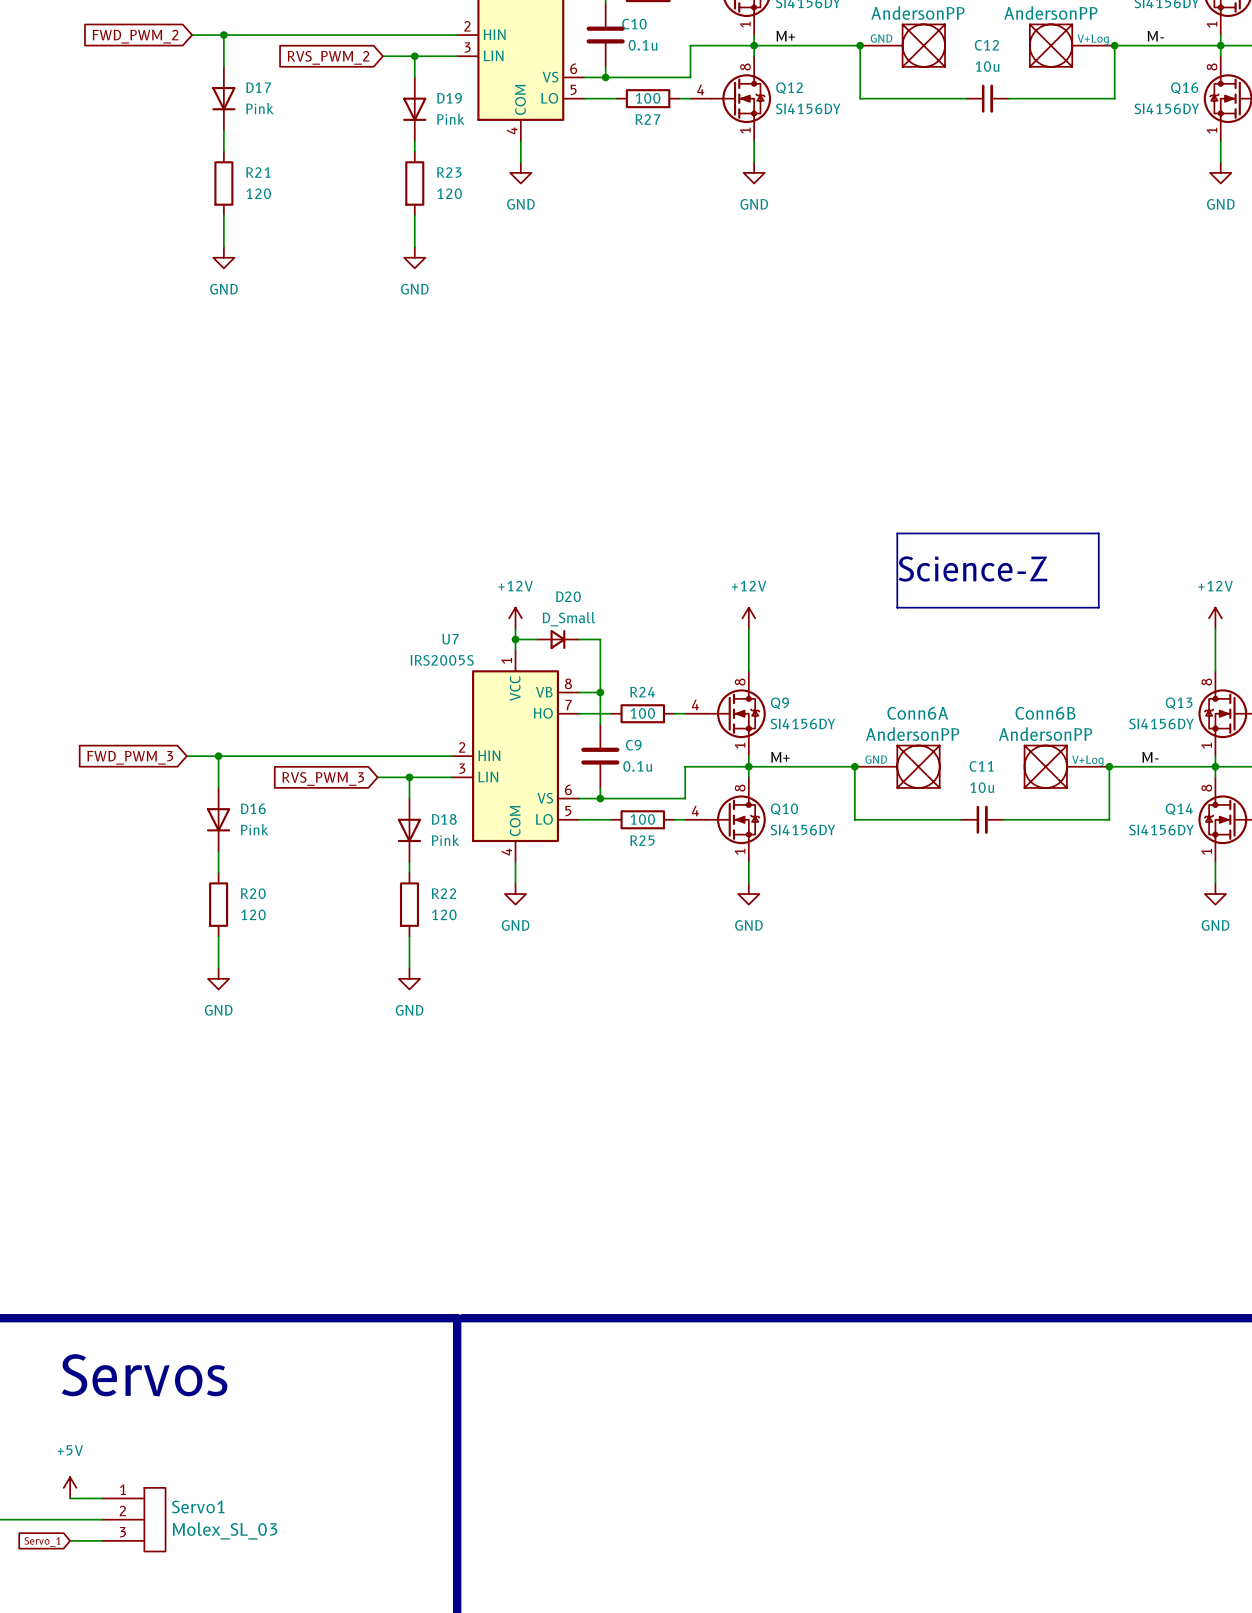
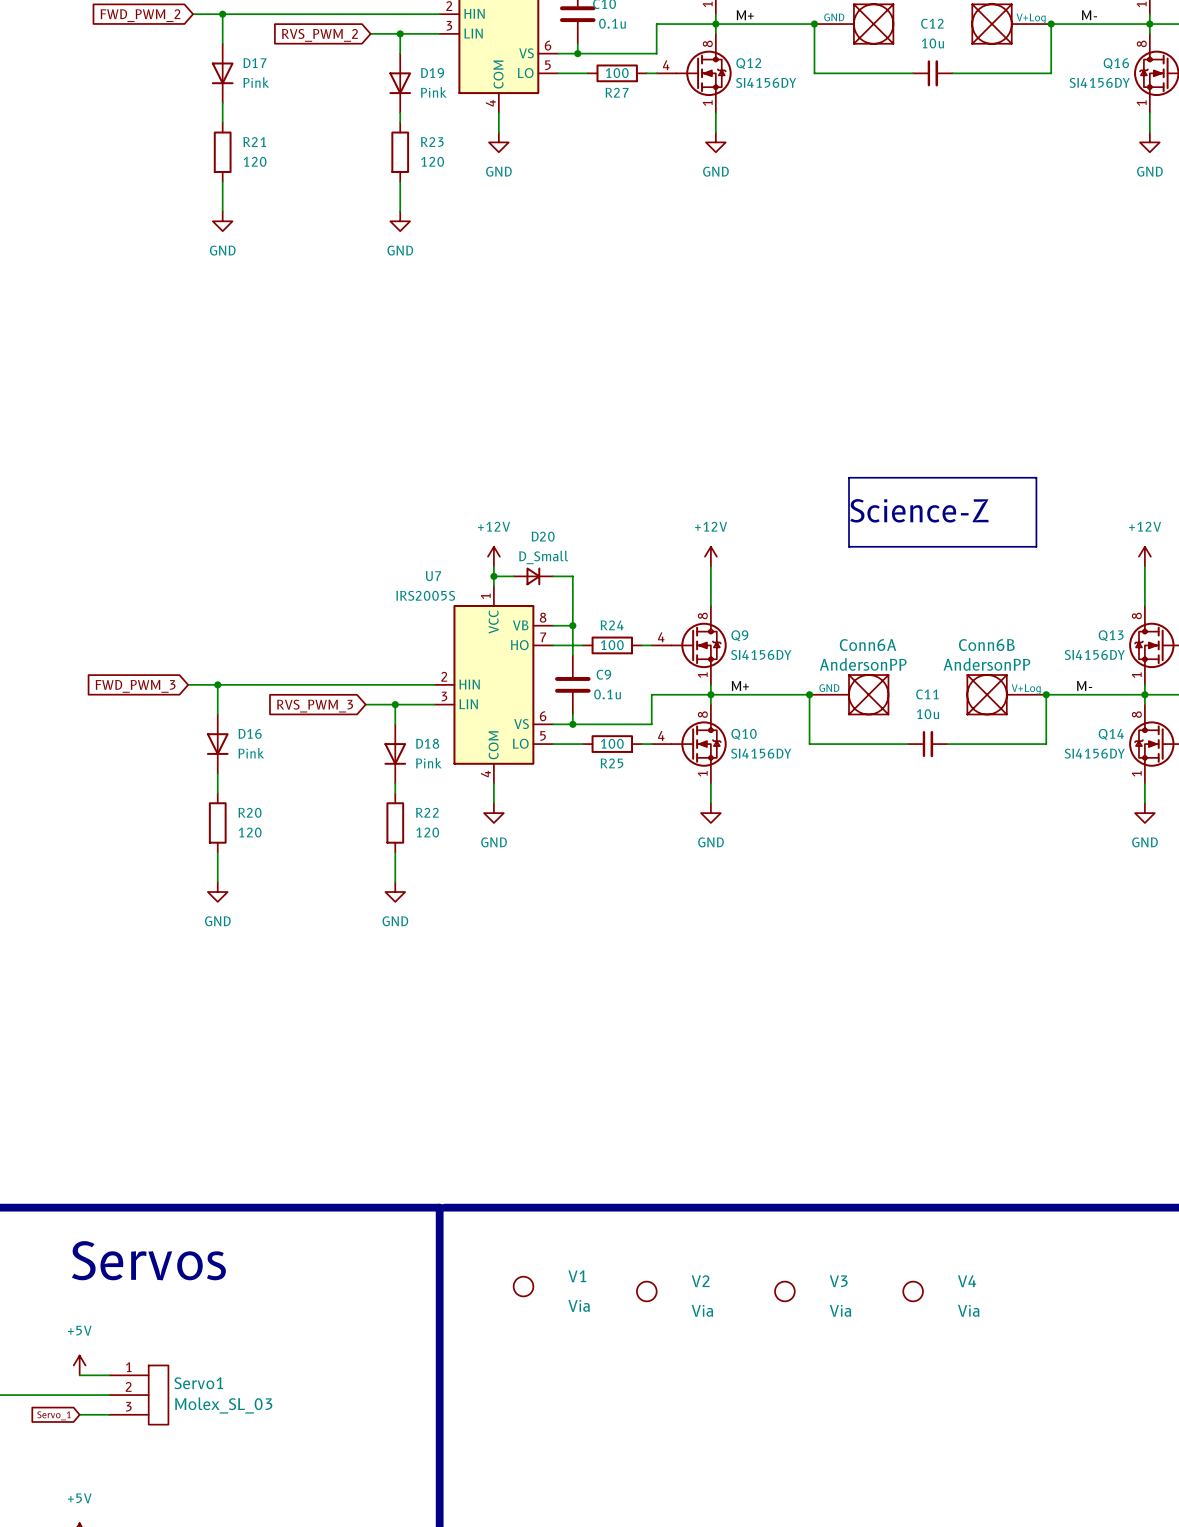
V1: none -> Via (523, 1286)
V2: none -> Via (646, 1291)
V3: none -> Via (784, 1291)
V4: none -> Via (913, 1291)

